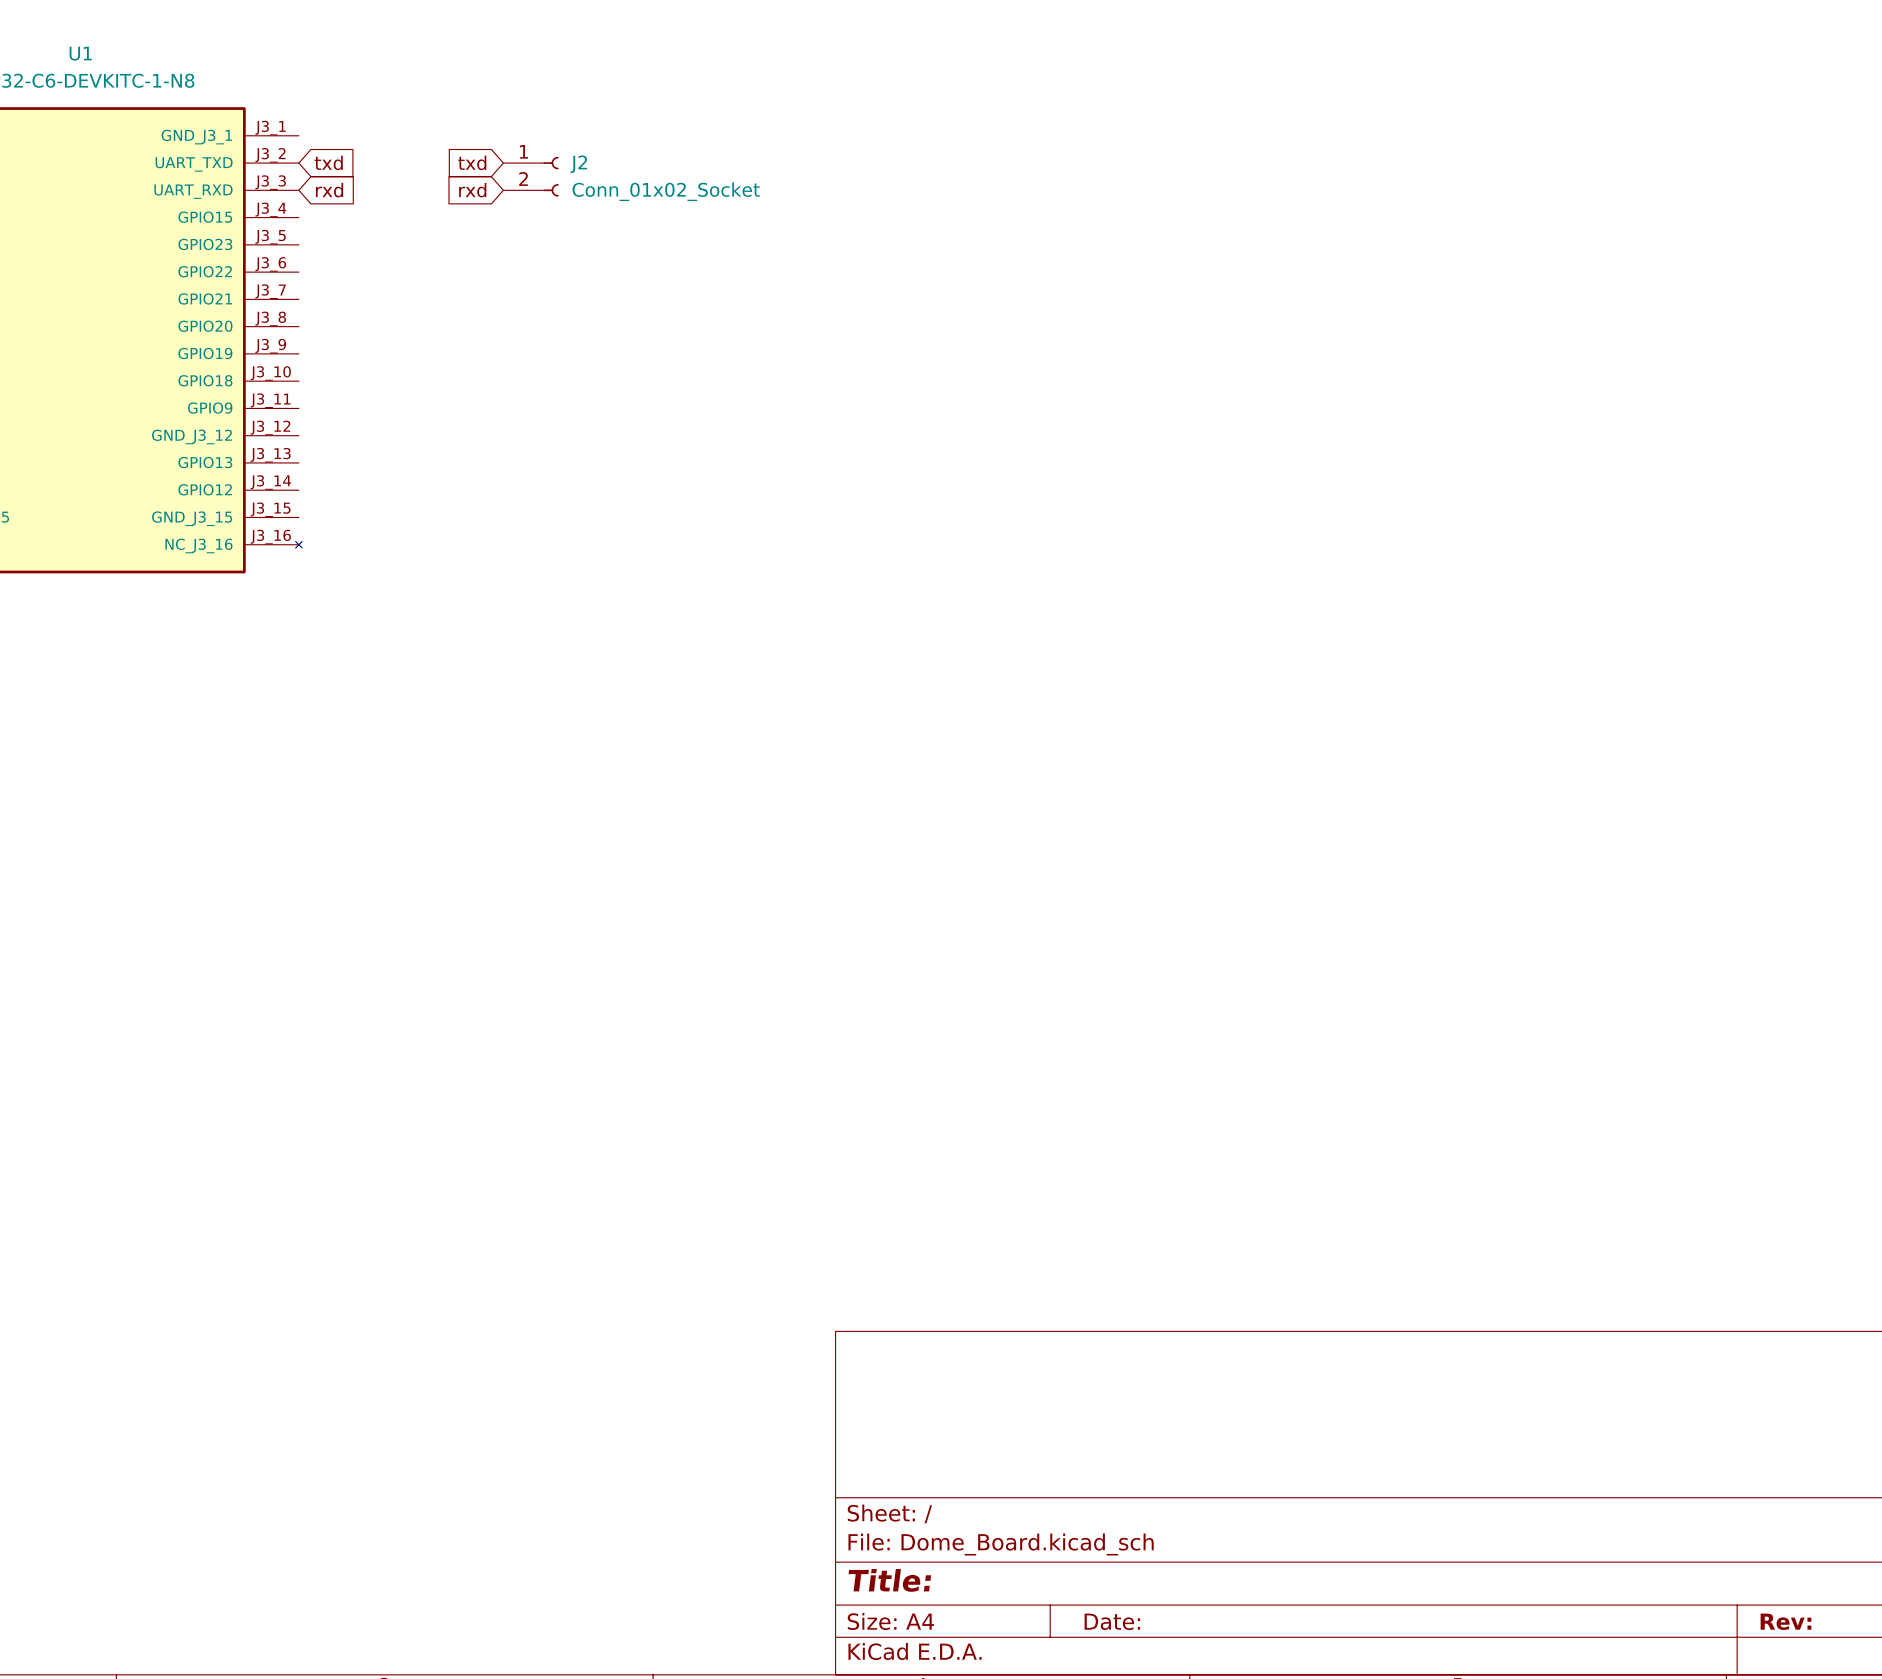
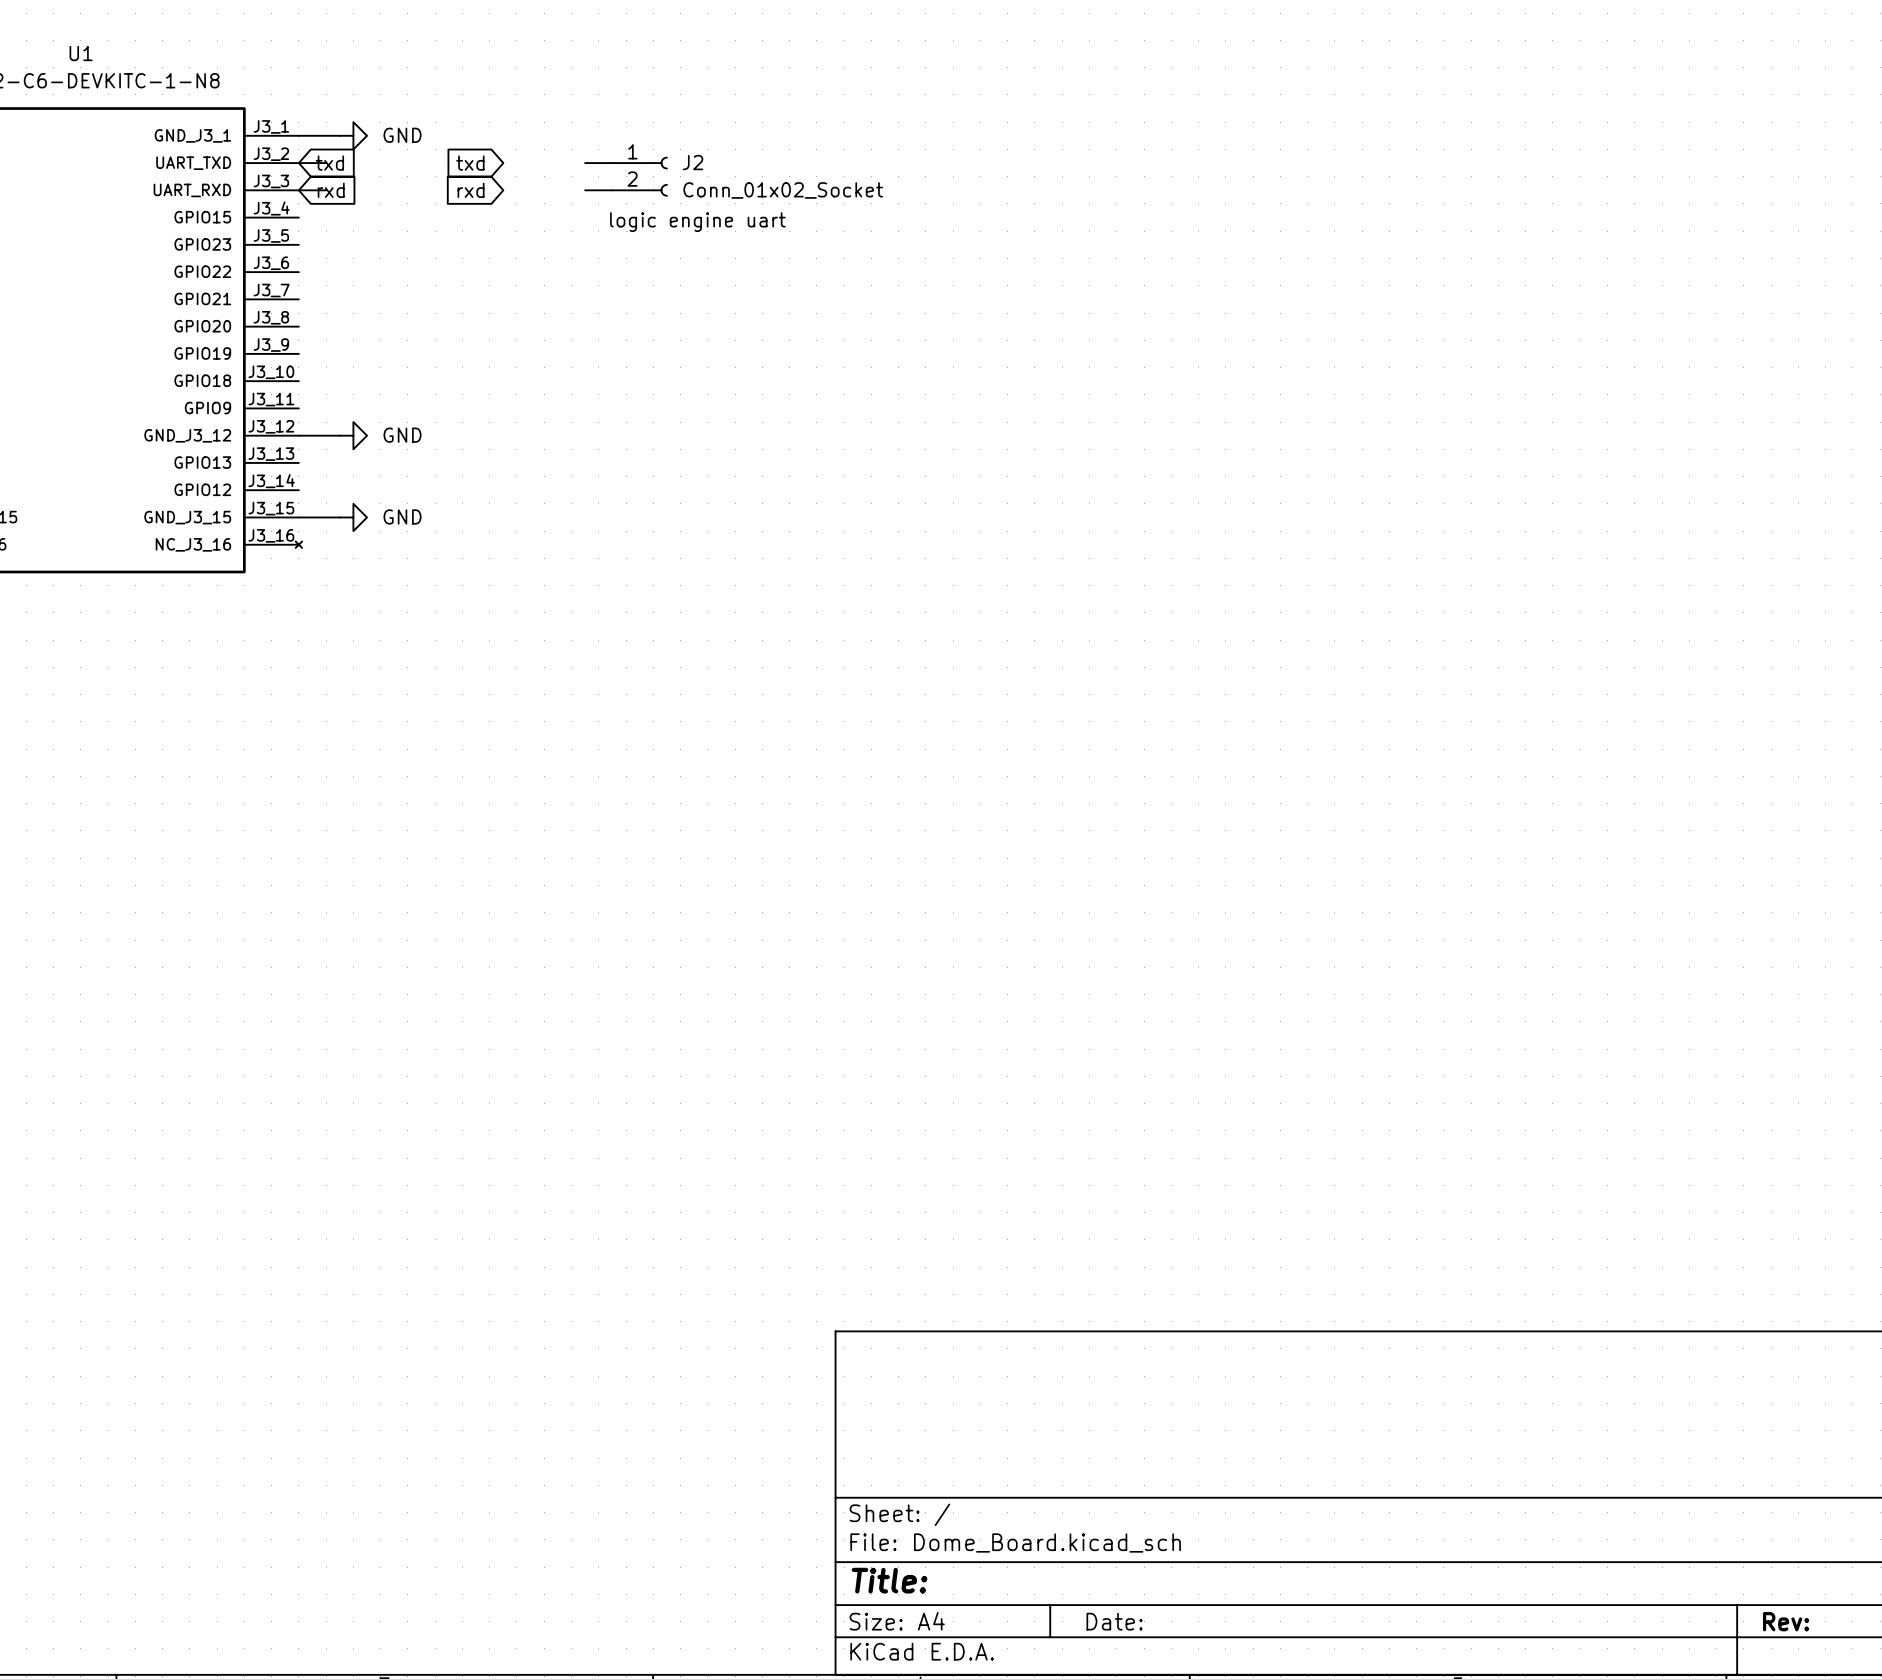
wire: none -> (298, 135) (339, 135)
power symbol: none -> GND (353, 135)
wire: none -> (298, 163) (326, 163)
wire: none -> (585, 163) (612, 163)
J2 position: (531, 176) -> (640, 176)
wire: none -> (298, 190) (326, 190)
wire: none -> (585, 190) (612, 190)
text: none -> logic engine uart (697, 222)
wire: none -> (298, 435) (339, 435)
power symbol: none -> GND (353, 435)
wire: none -> (298, 517) (339, 517)
power symbol: none -> GND (353, 517)

